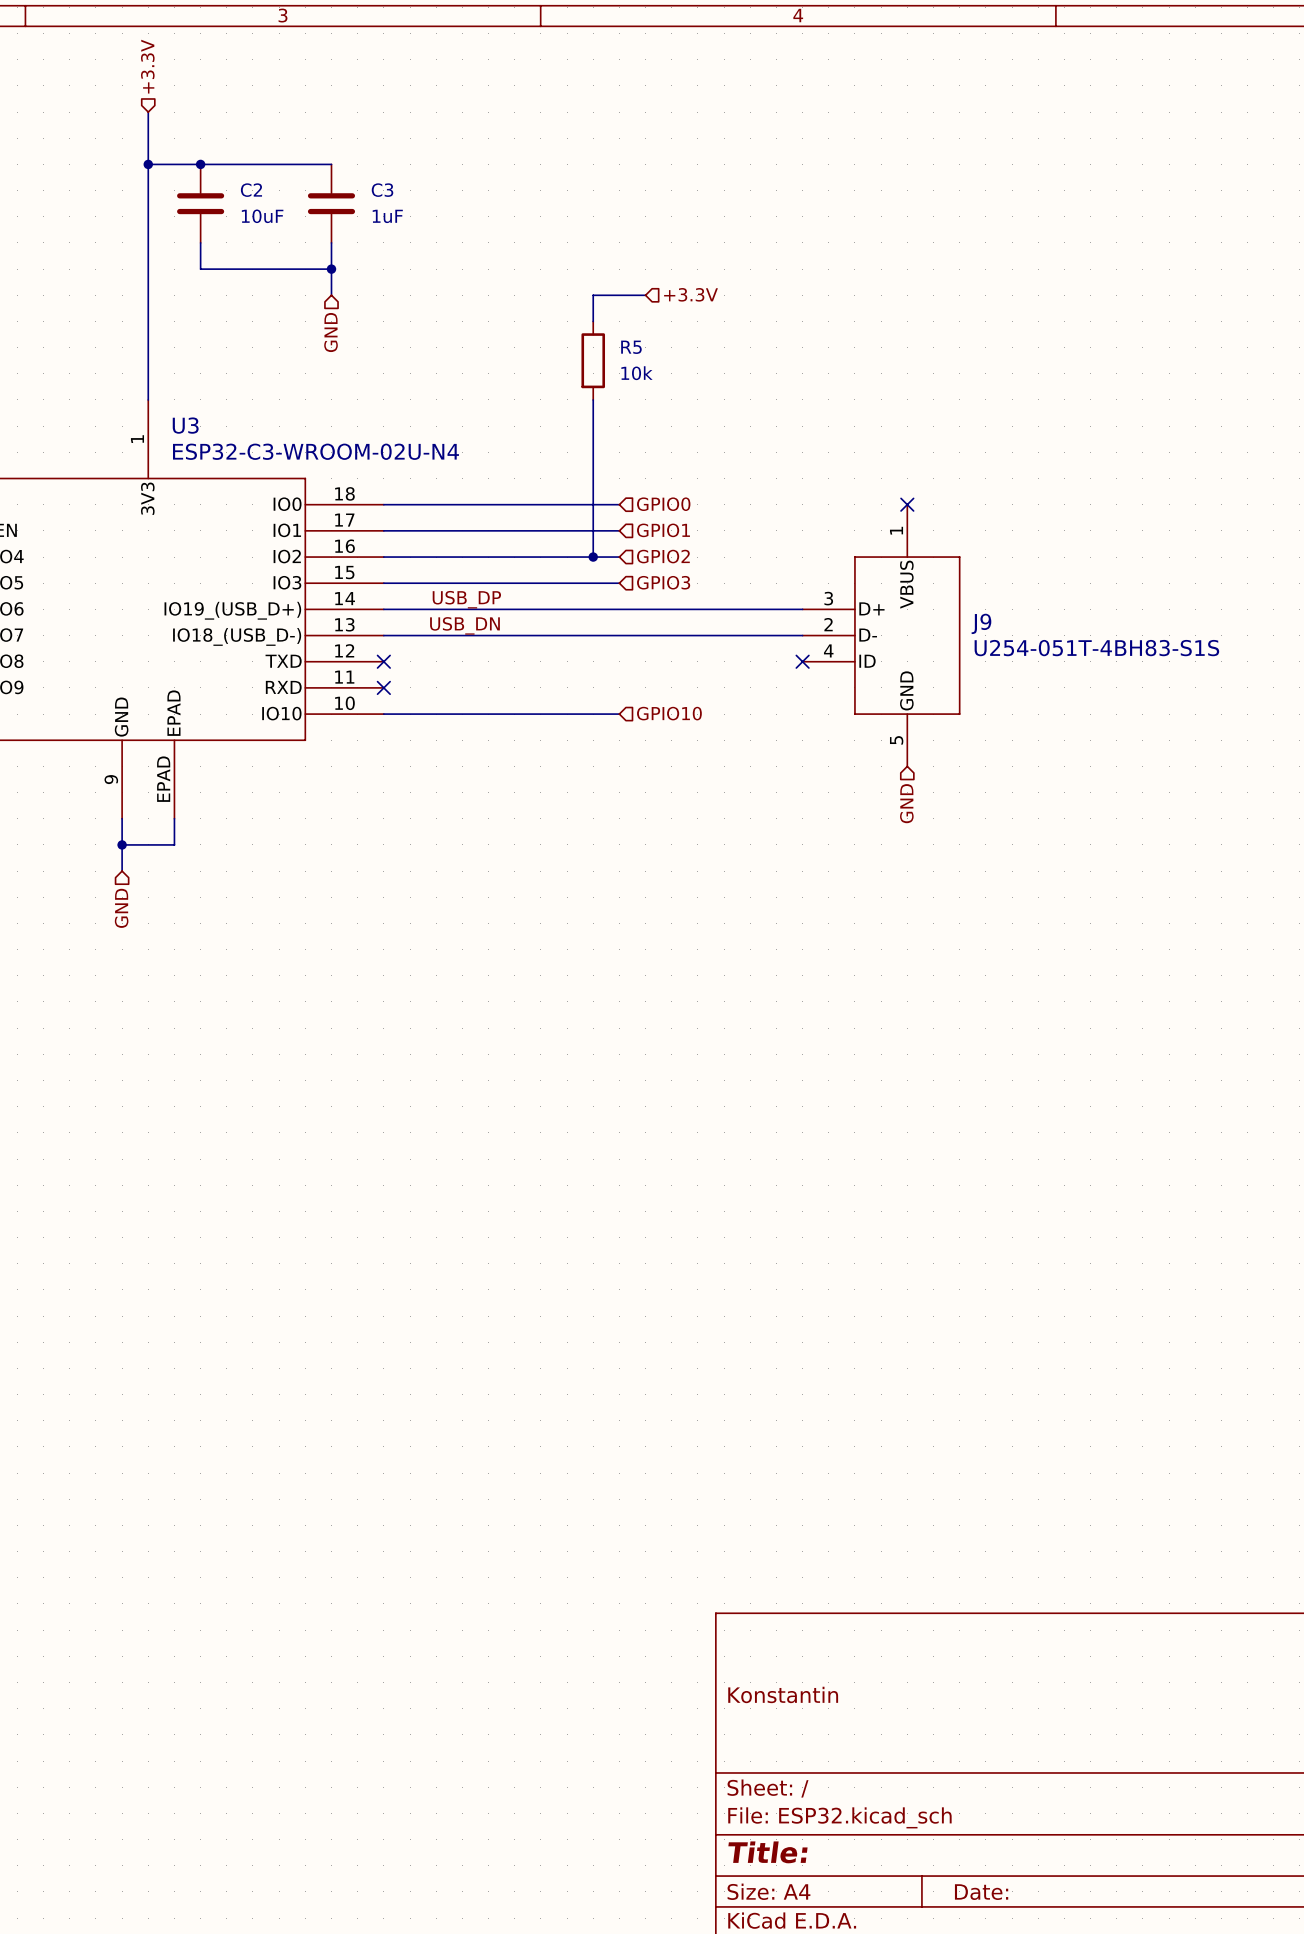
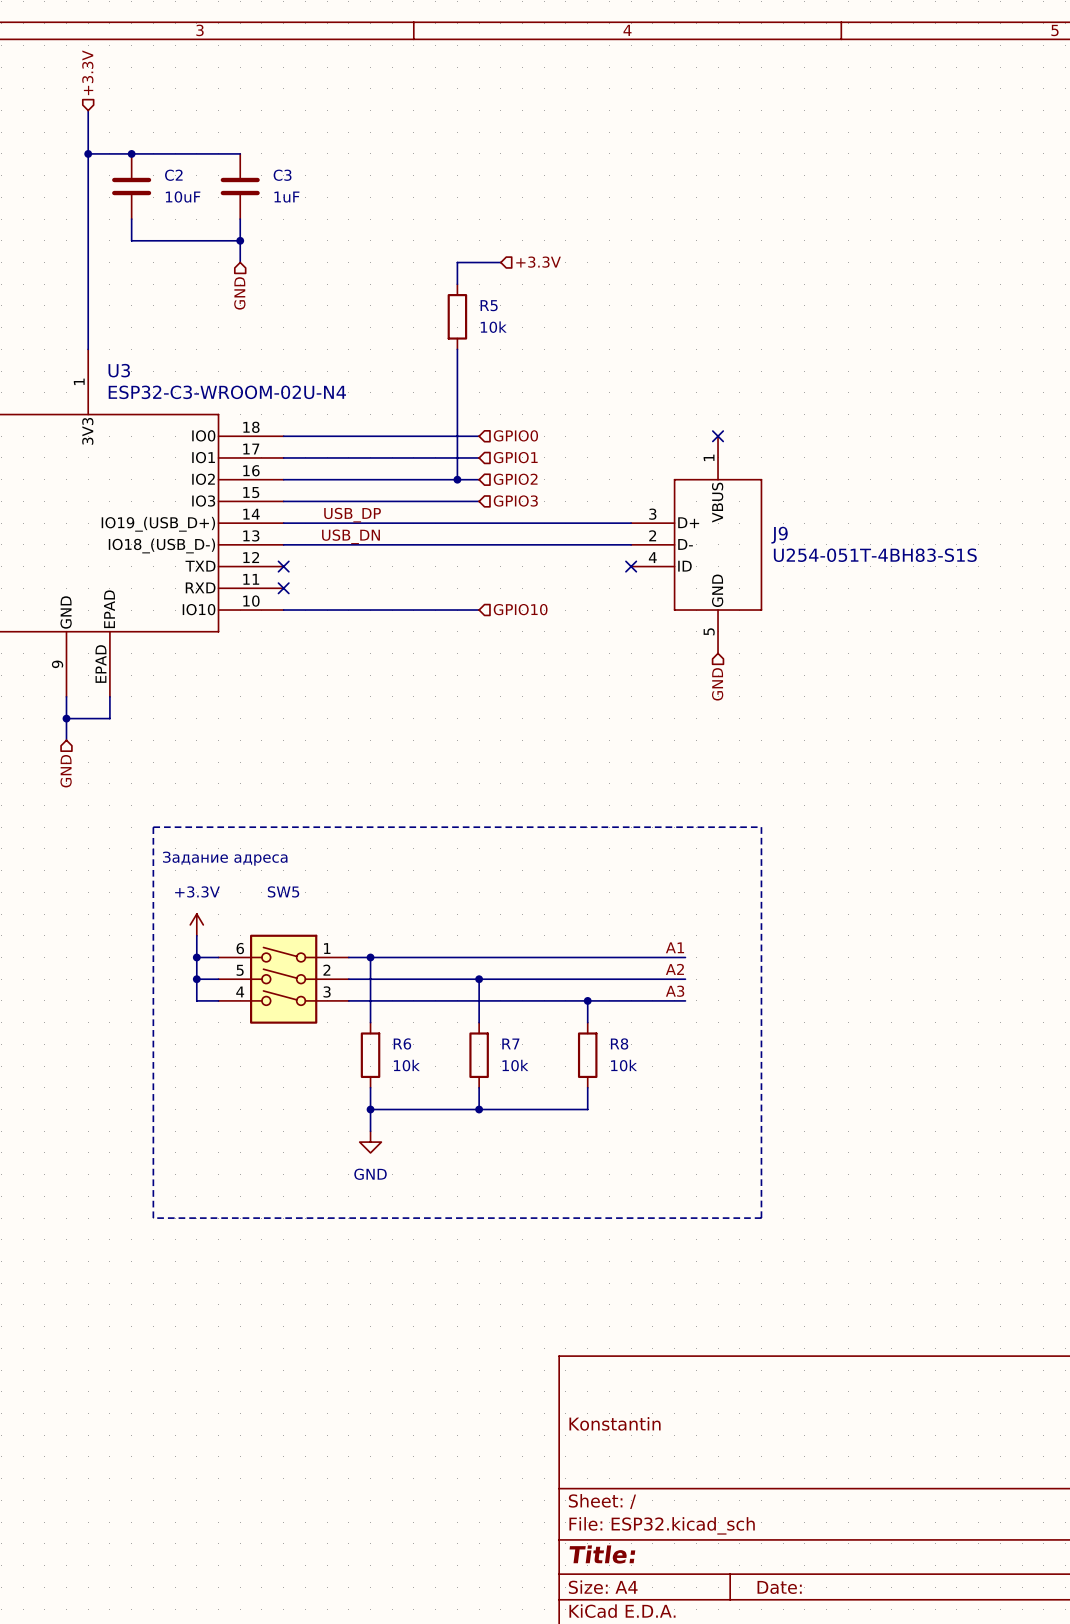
line: none -> (153, 827) (761, 827) (761, 1218) (153, 1218) (153, 827)
text: none -> Задание адреса (225, 858)
power symbol: none -> +3.3V (196, 924)
wire: none -> (196, 935) (196, 1000) (218, 1000)
label: none -> A1 (674, 947)
wire: none -> (196, 957) (218, 957)
junction: none -> (196, 957)
wire: none -> (348, 957) (685, 957)
wire: none -> (370, 957) (370, 1022)
junction: none -> (370, 957)
label: none -> A2 (674, 969)
wire: none -> (196, 979) (218, 979)
junction: none -> (196, 979)
SW5: none -> (283, 979)
wire: none -> (348, 979) (685, 979)
wire: none -> (479, 979) (479, 1022)
junction: none -> (479, 979)
label: none -> A3 (675, 991)
wire: none -> (348, 1000) (685, 1000)
wire: none -> (587, 1000) (587, 1022)
junction: none -> (587, 1000)
R6: none -> 10k (370, 1055)
R7: none -> 10k (479, 1055)
R8: none -> 10k (587, 1055)
wire: none -> (370, 1087) (370, 1131)
wire: none -> (479, 1087) (479, 1109)
wire: none -> (587, 1087) (587, 1109) (370, 1109)
junction: none -> (370, 1109)
junction: none -> (479, 1109)
power symbol: none -> GND (370, 1142)

